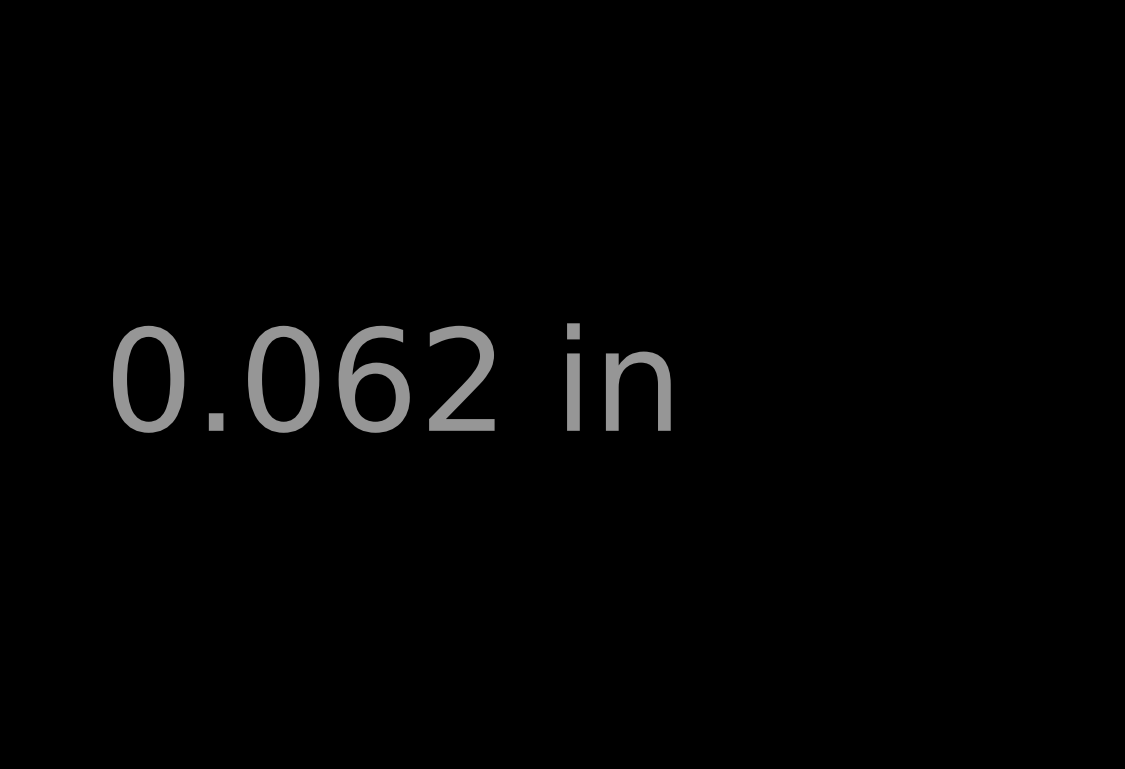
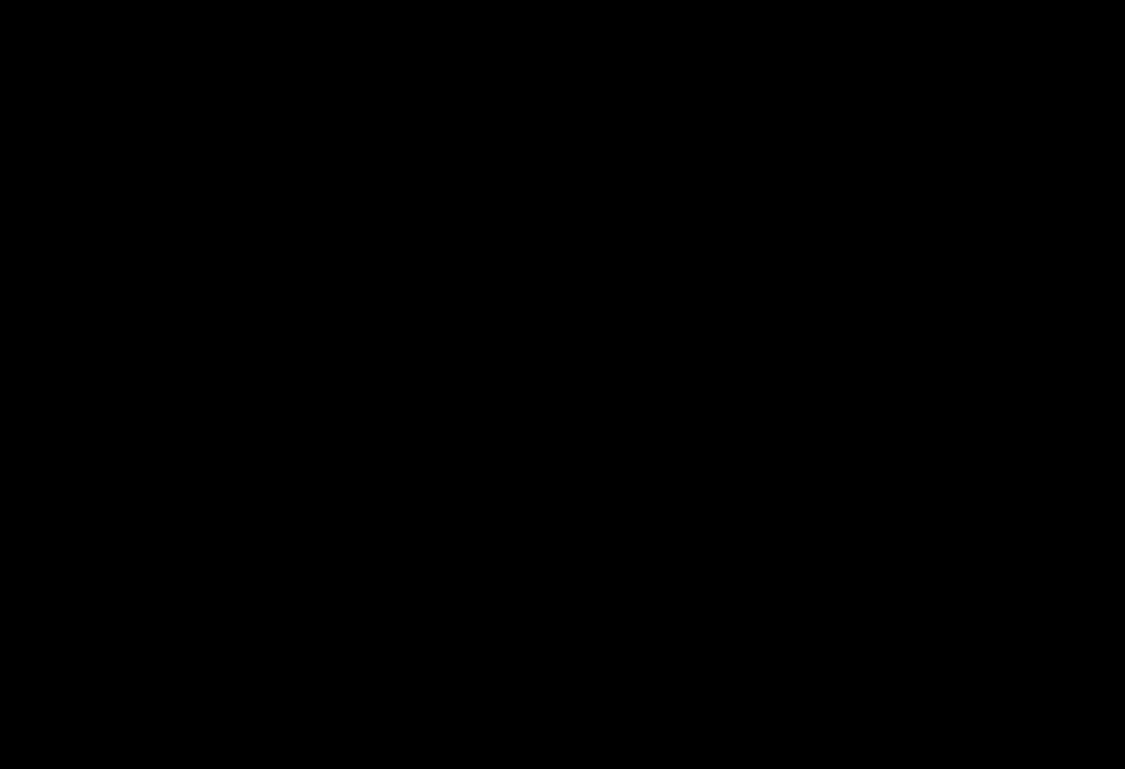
text: 0.062 in (391, 378) -> none

